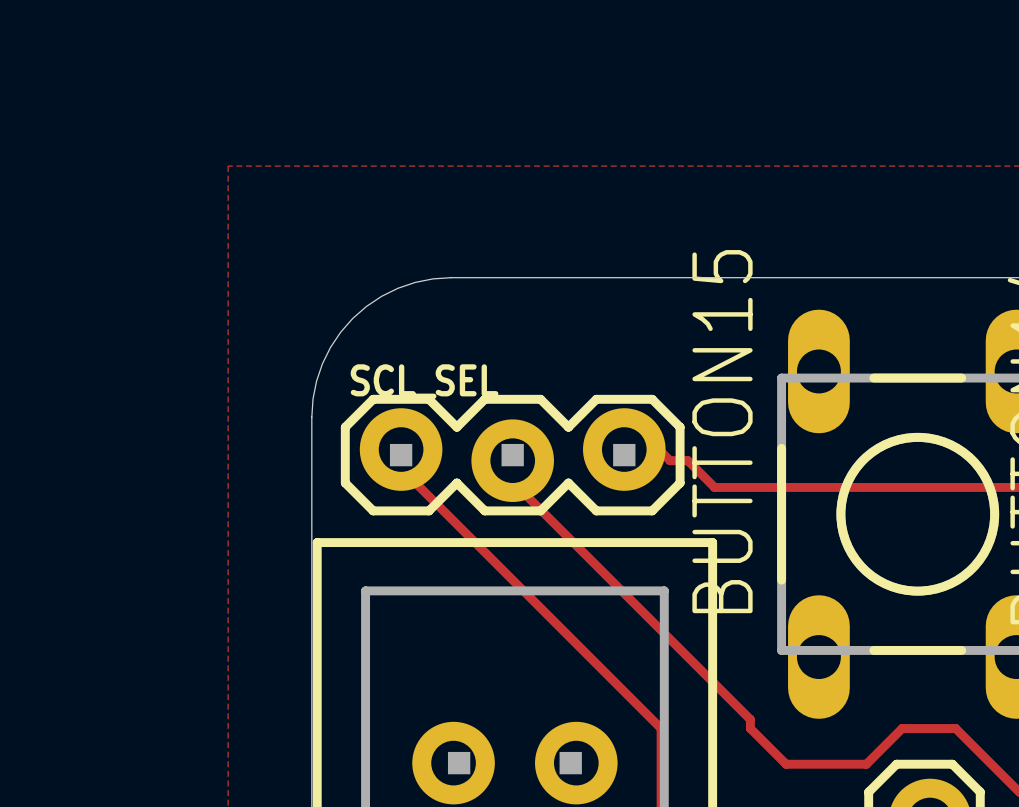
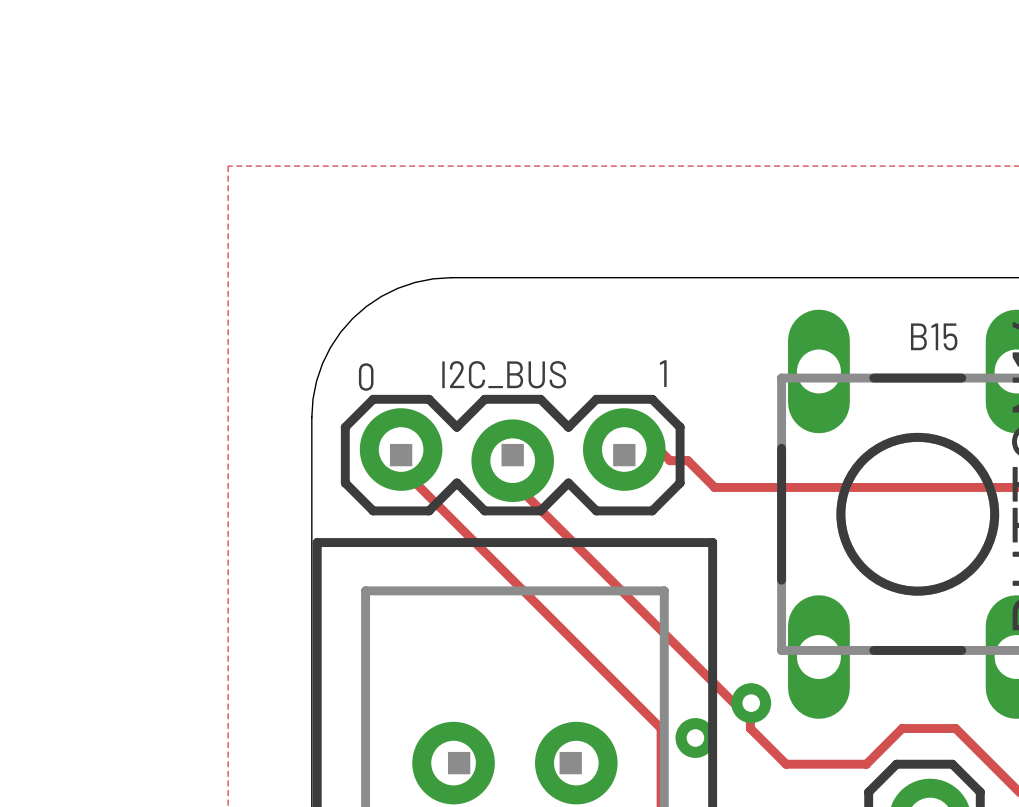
SCL_SEL text: none -> 1 (663, 373)
SCL_SEL text: none -> 0 (366, 377)
SCL_SEL name: SCL_SEL (424, 381) -> I2C_BUS (504, 374)
BUTTON15 name: BUTTON15 (722, 431) -> B15 (934, 336)
via: none -> (751, 703)
via: none -> (695, 738)

